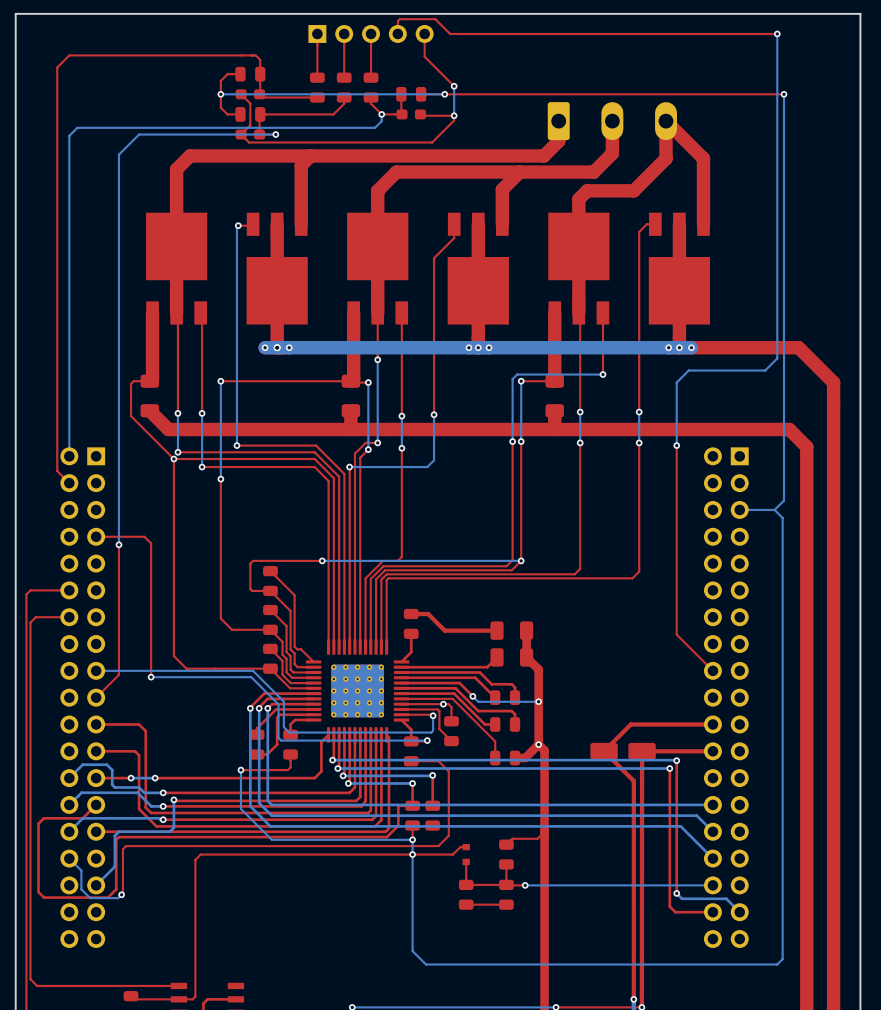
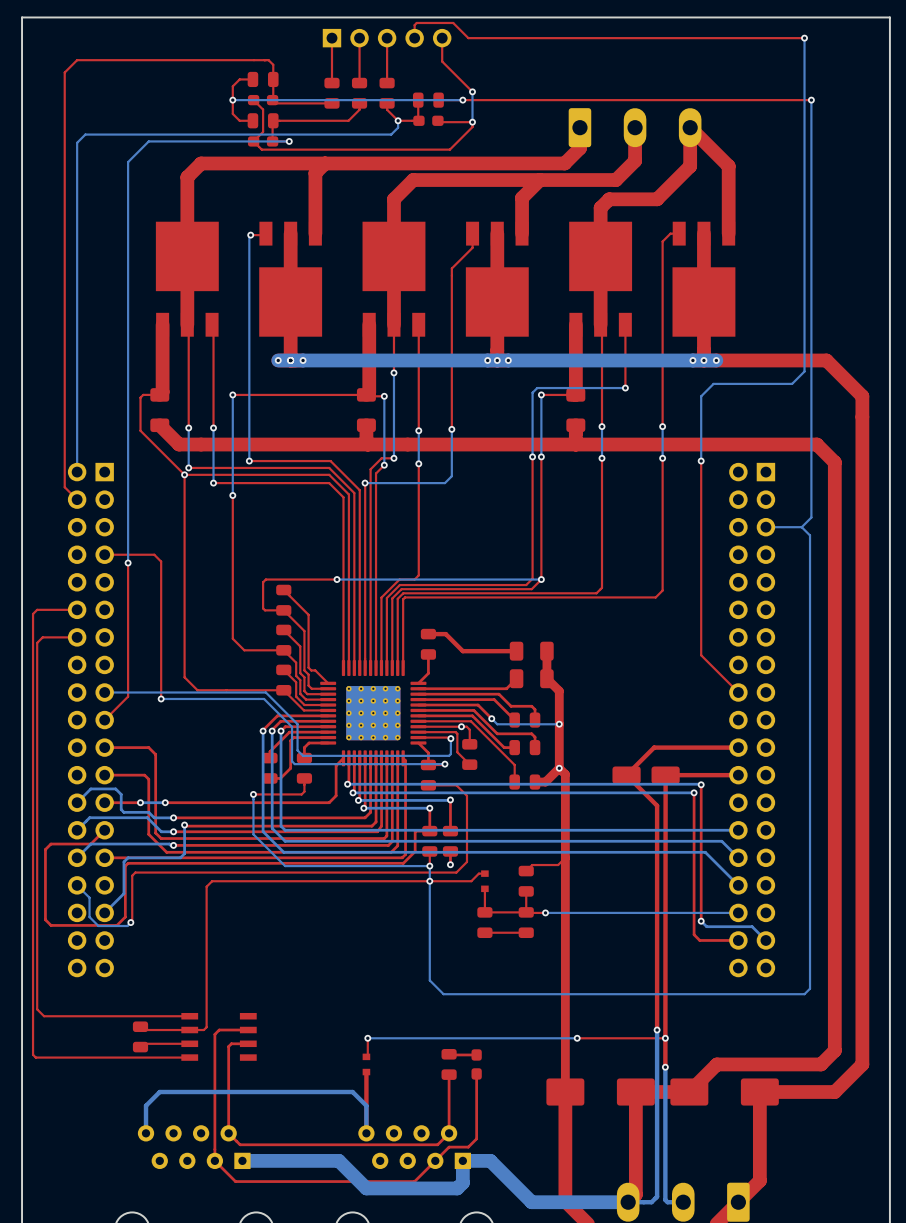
top track: none -> (450, 851) (450, 864)
via: none -> (450, 864)

